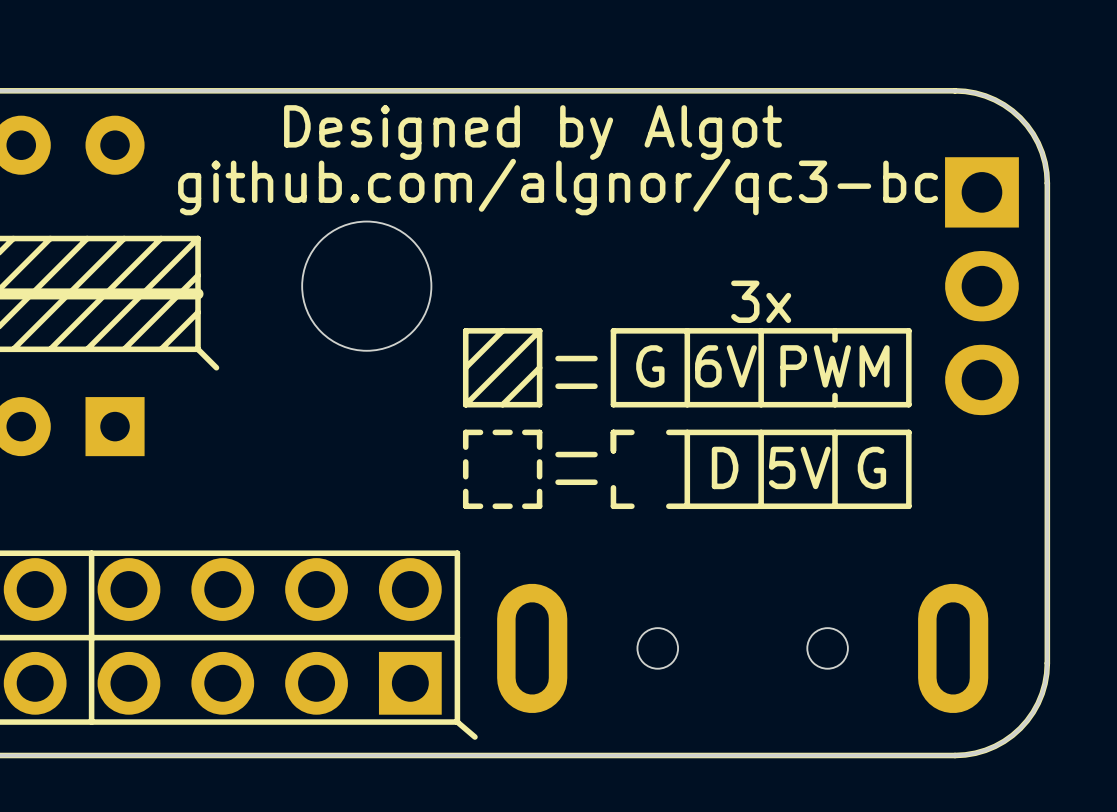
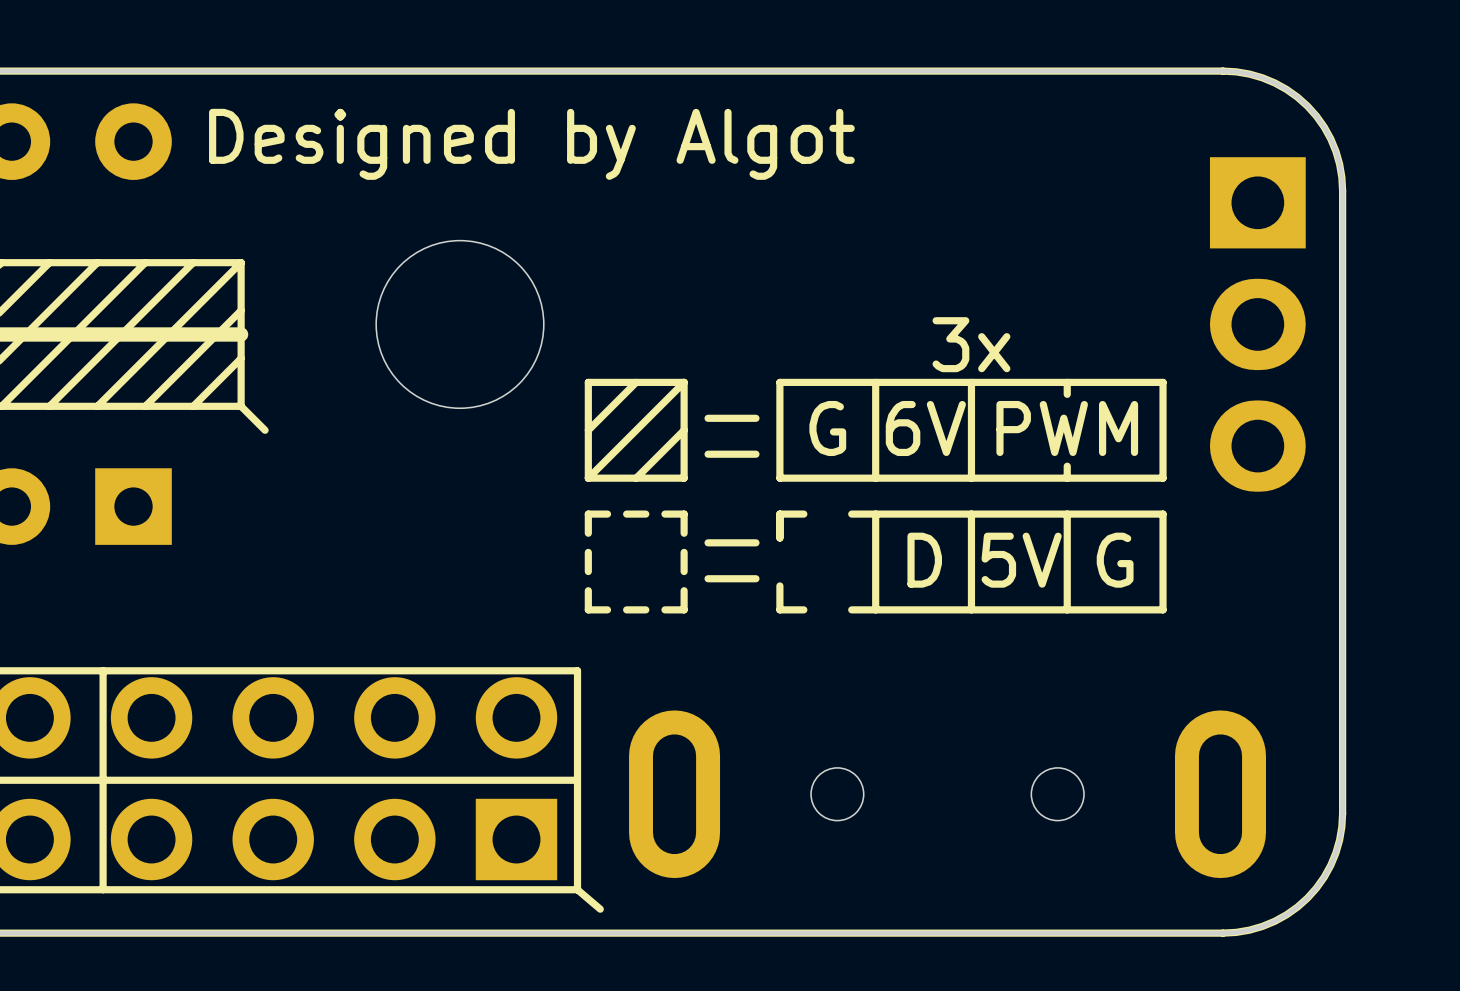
text position: Designed by Algot (532, 132) -> Designed by Algot (531, 144)
text: github.com/algnor/qc3-bc (558, 187) -> none

